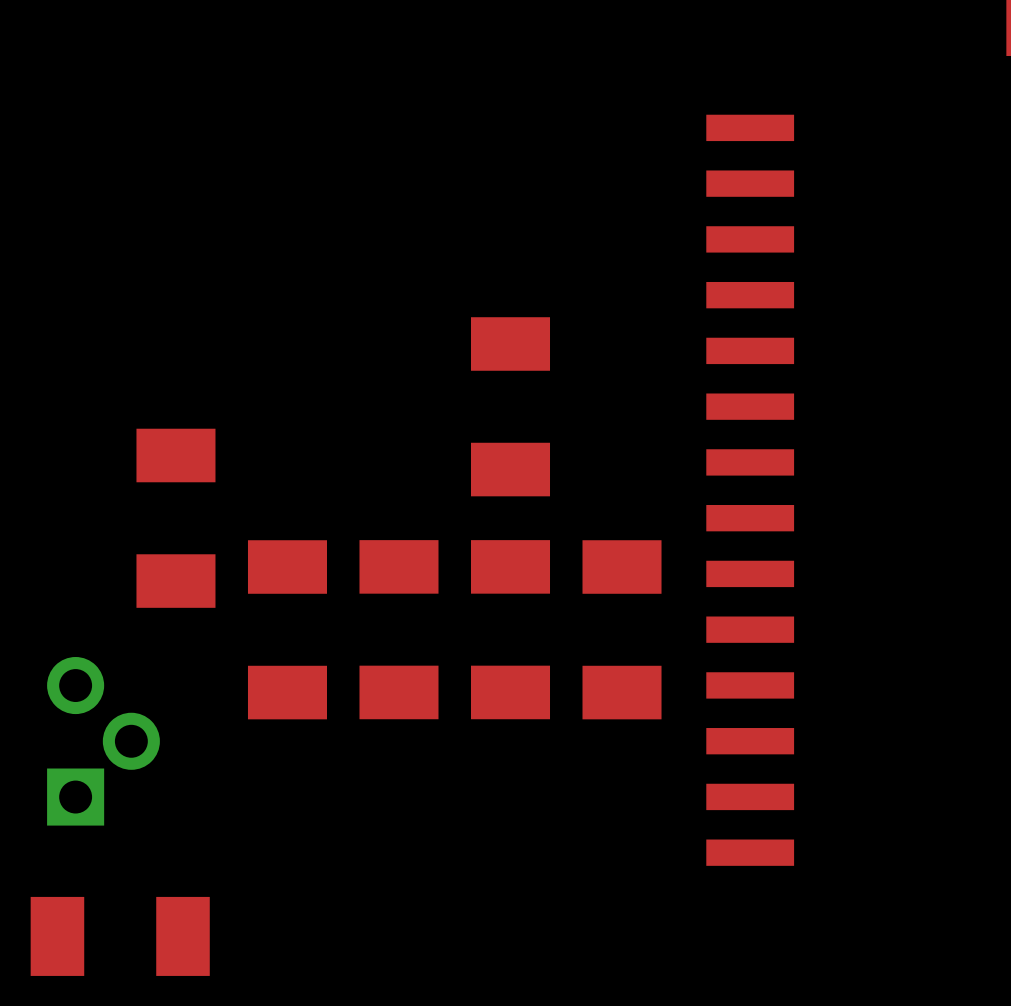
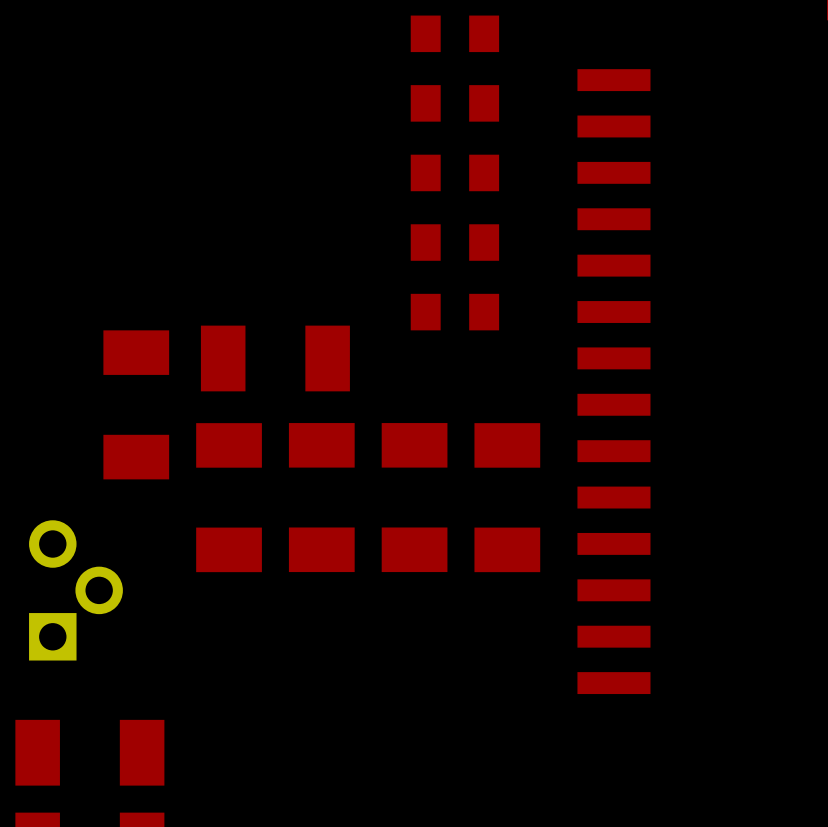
part: none -> (454, 33)
part: none -> (454, 103)
part: none -> (454, 172)
part: none -> (454, 242)
part rotation: 0° (510, 406) -> 90° clockwise (275, 358)
part position: (510, 406) -> (275, 358)
part: none -> (454, 312)

